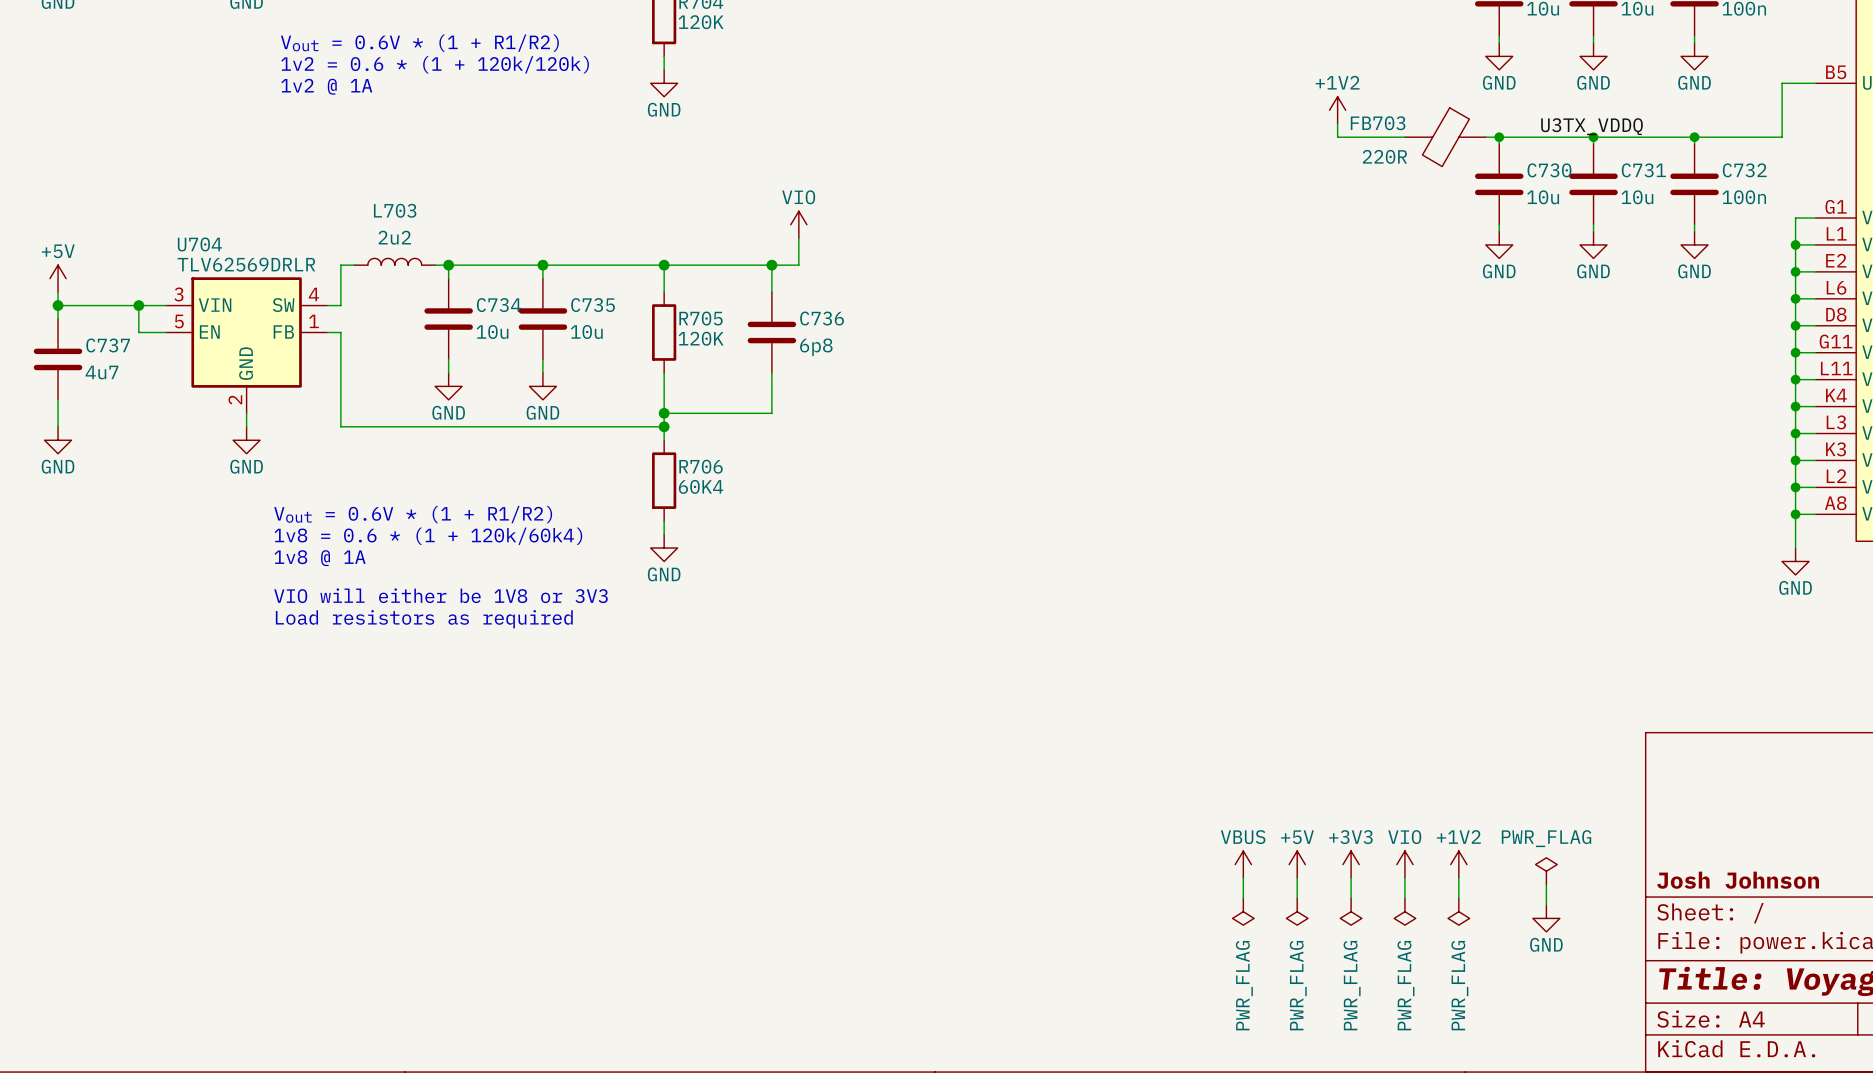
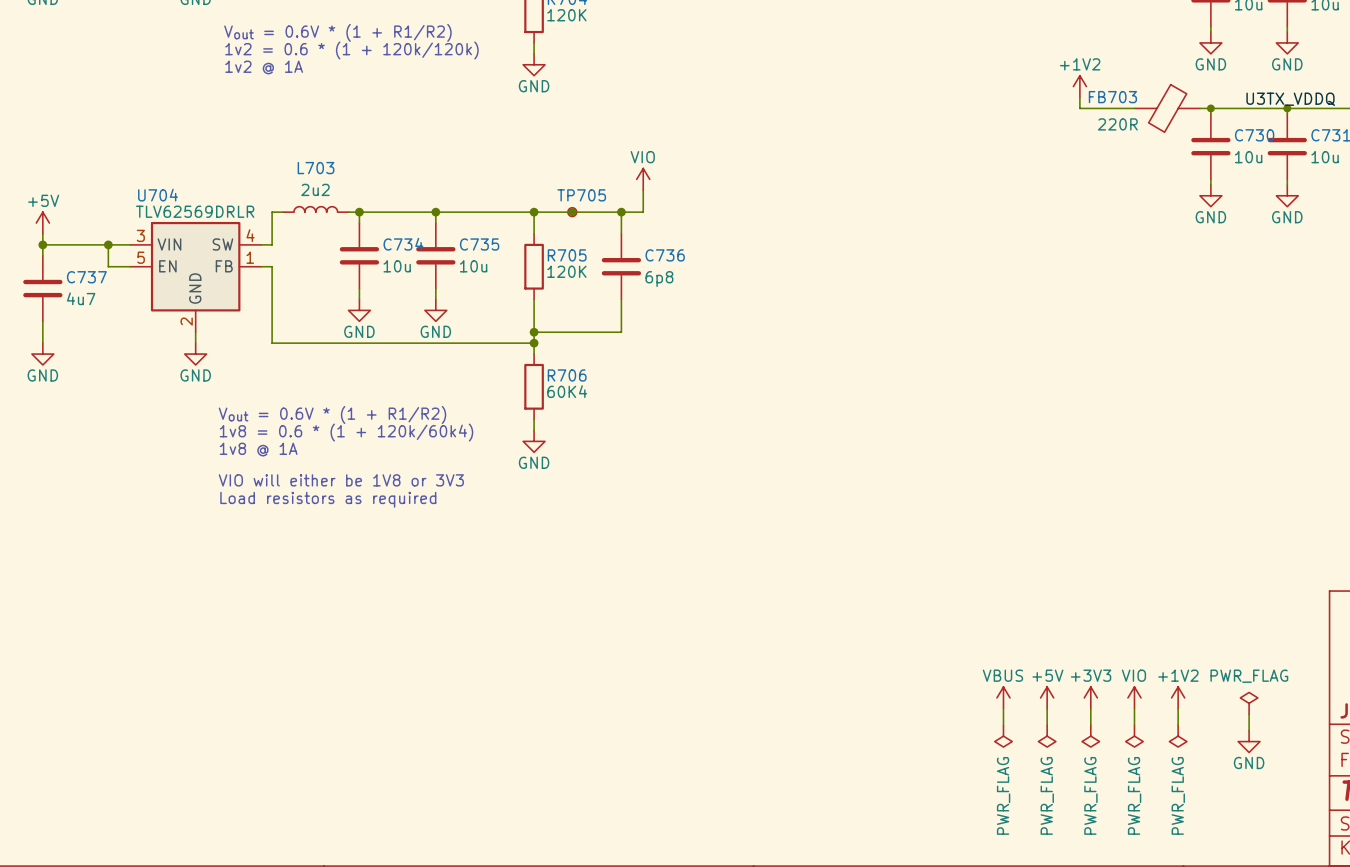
junction: none -> (572, 212)
TP705: none -> (572, 212)

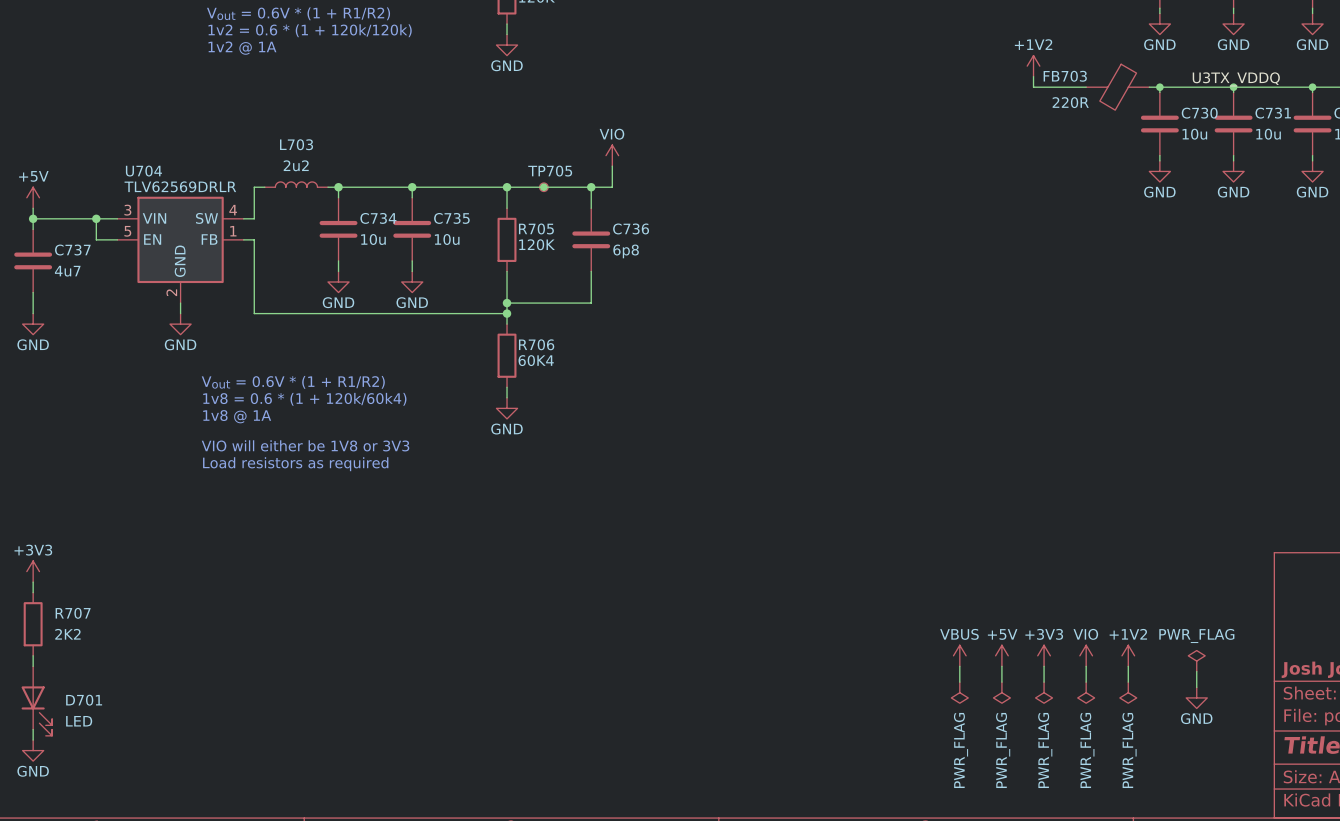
power symbol: none -> +3V3 (33, 571)
wire: none -> (33, 582) (33, 592)
R707: none -> 2K2 (33, 624)
wire: none -> (33, 655) (33, 666)
D701: none -> LED (36, 701)
wire: none -> (33, 729) (33, 740)
power symbol: none -> GND (33, 750)

